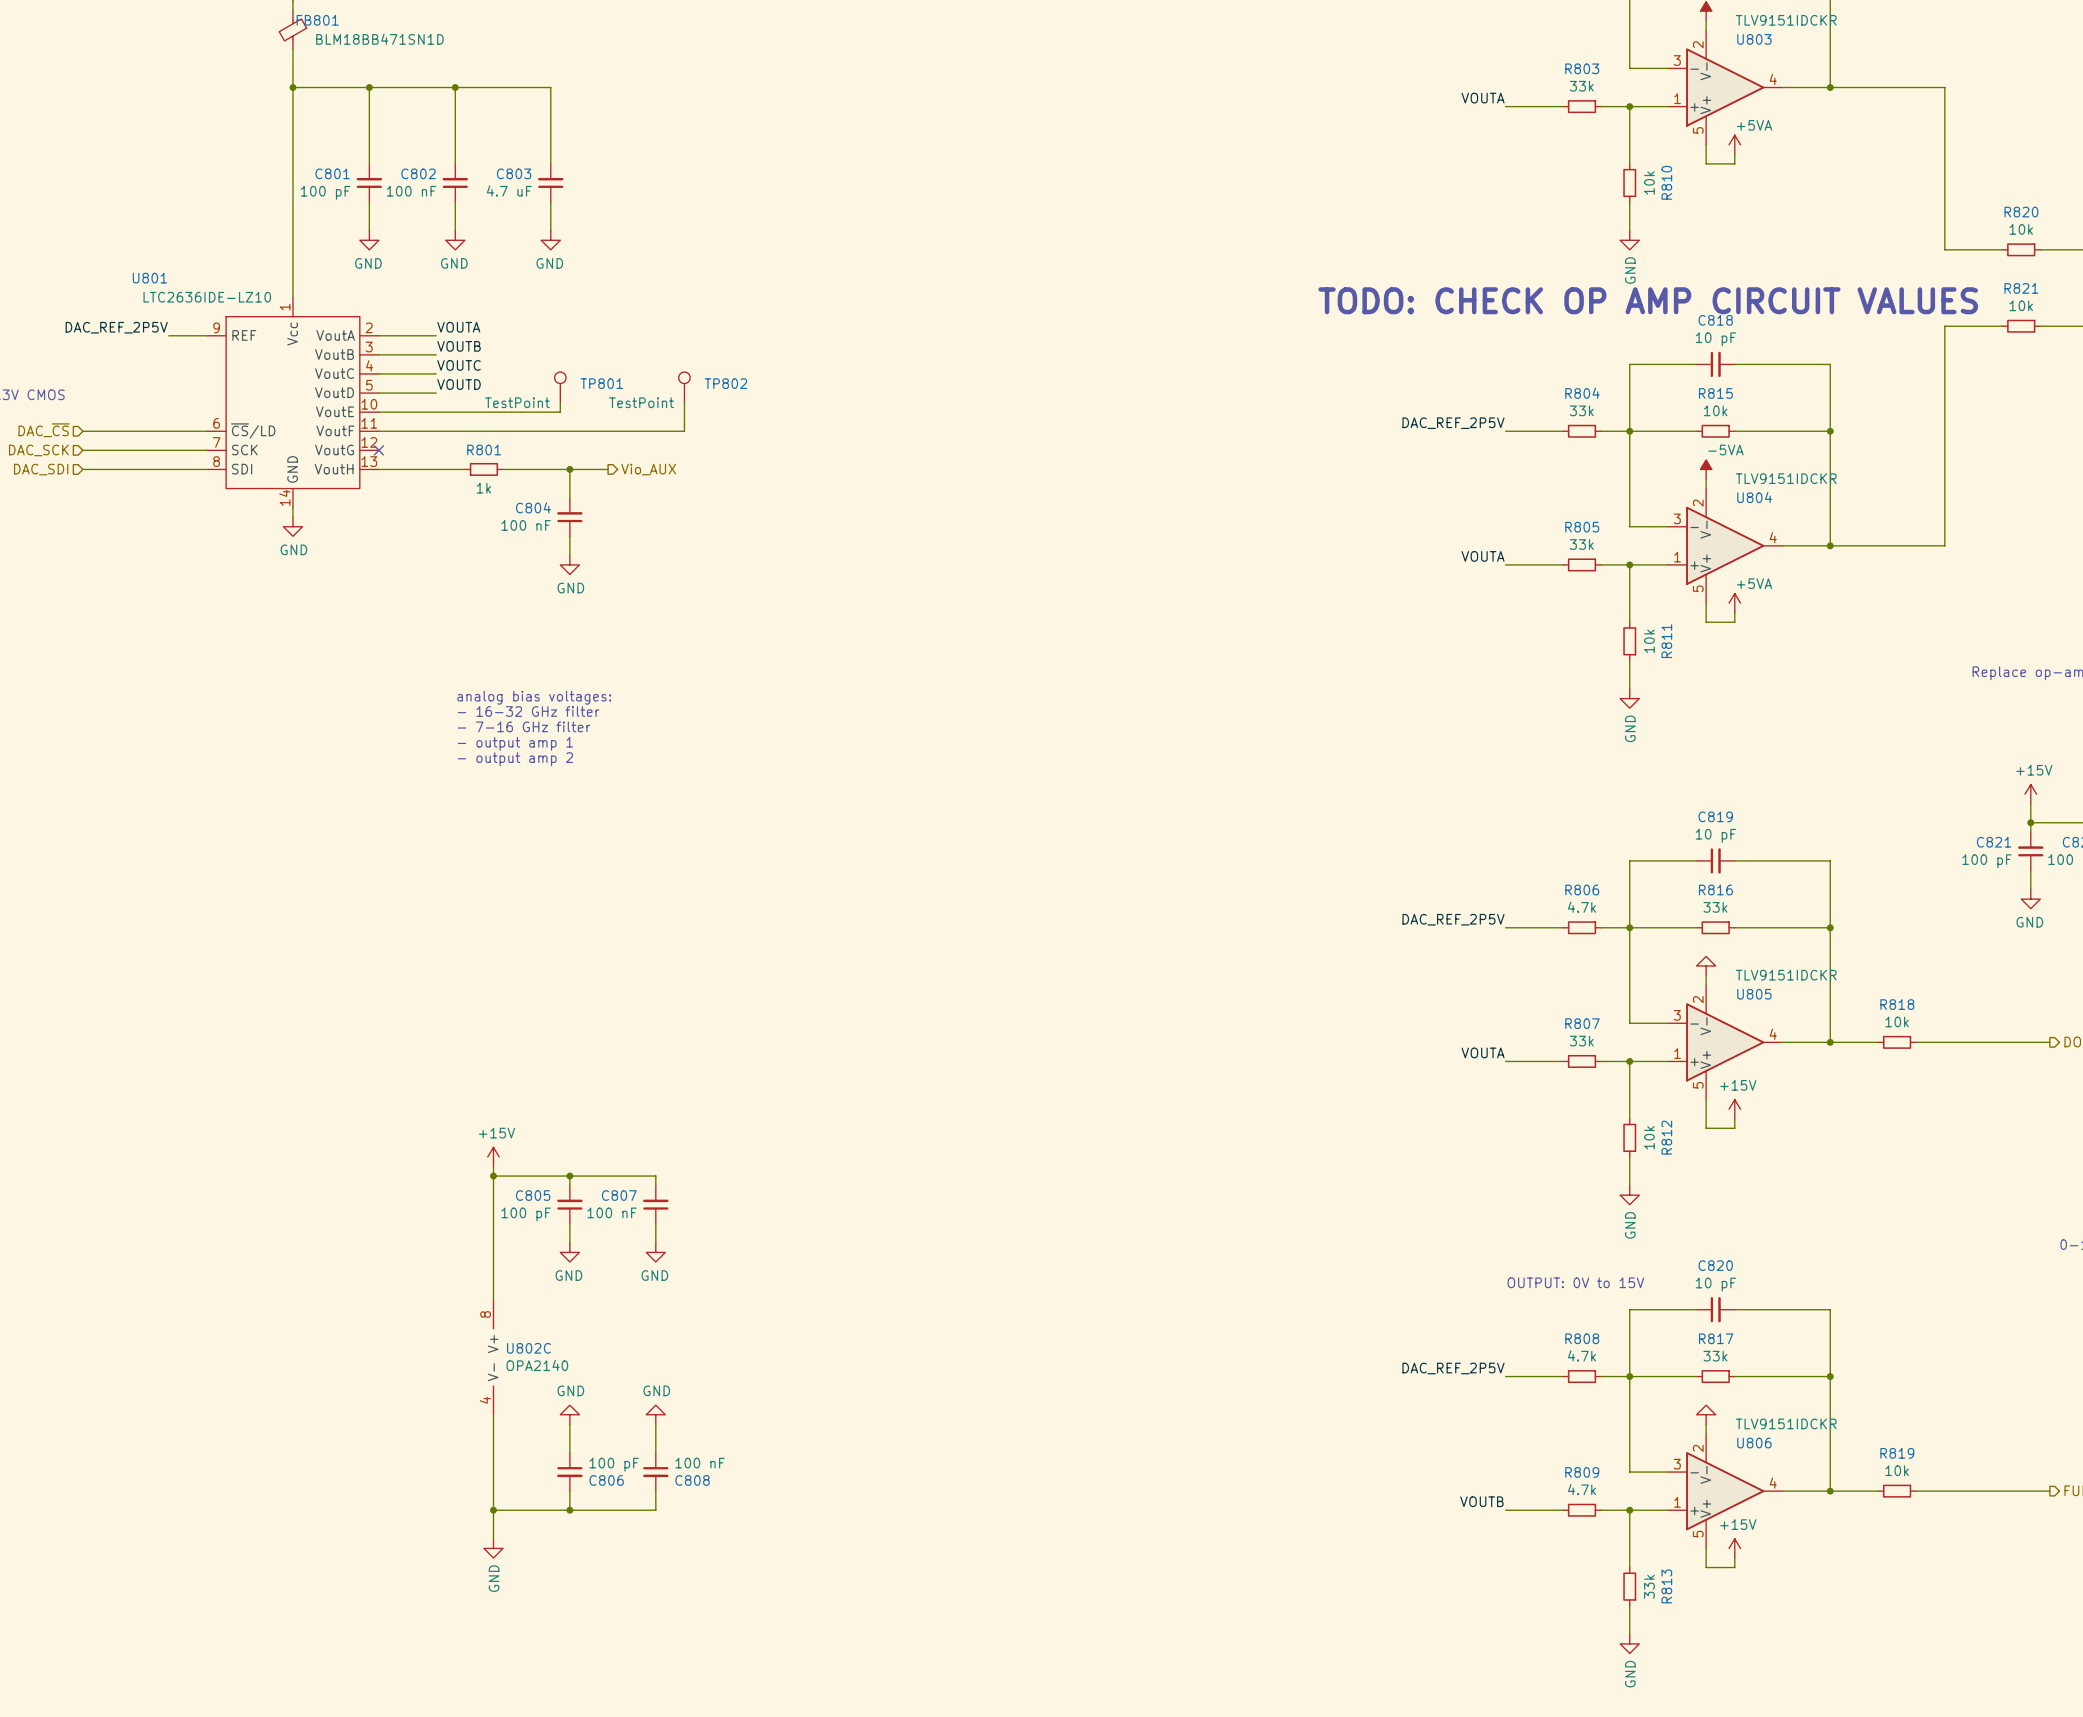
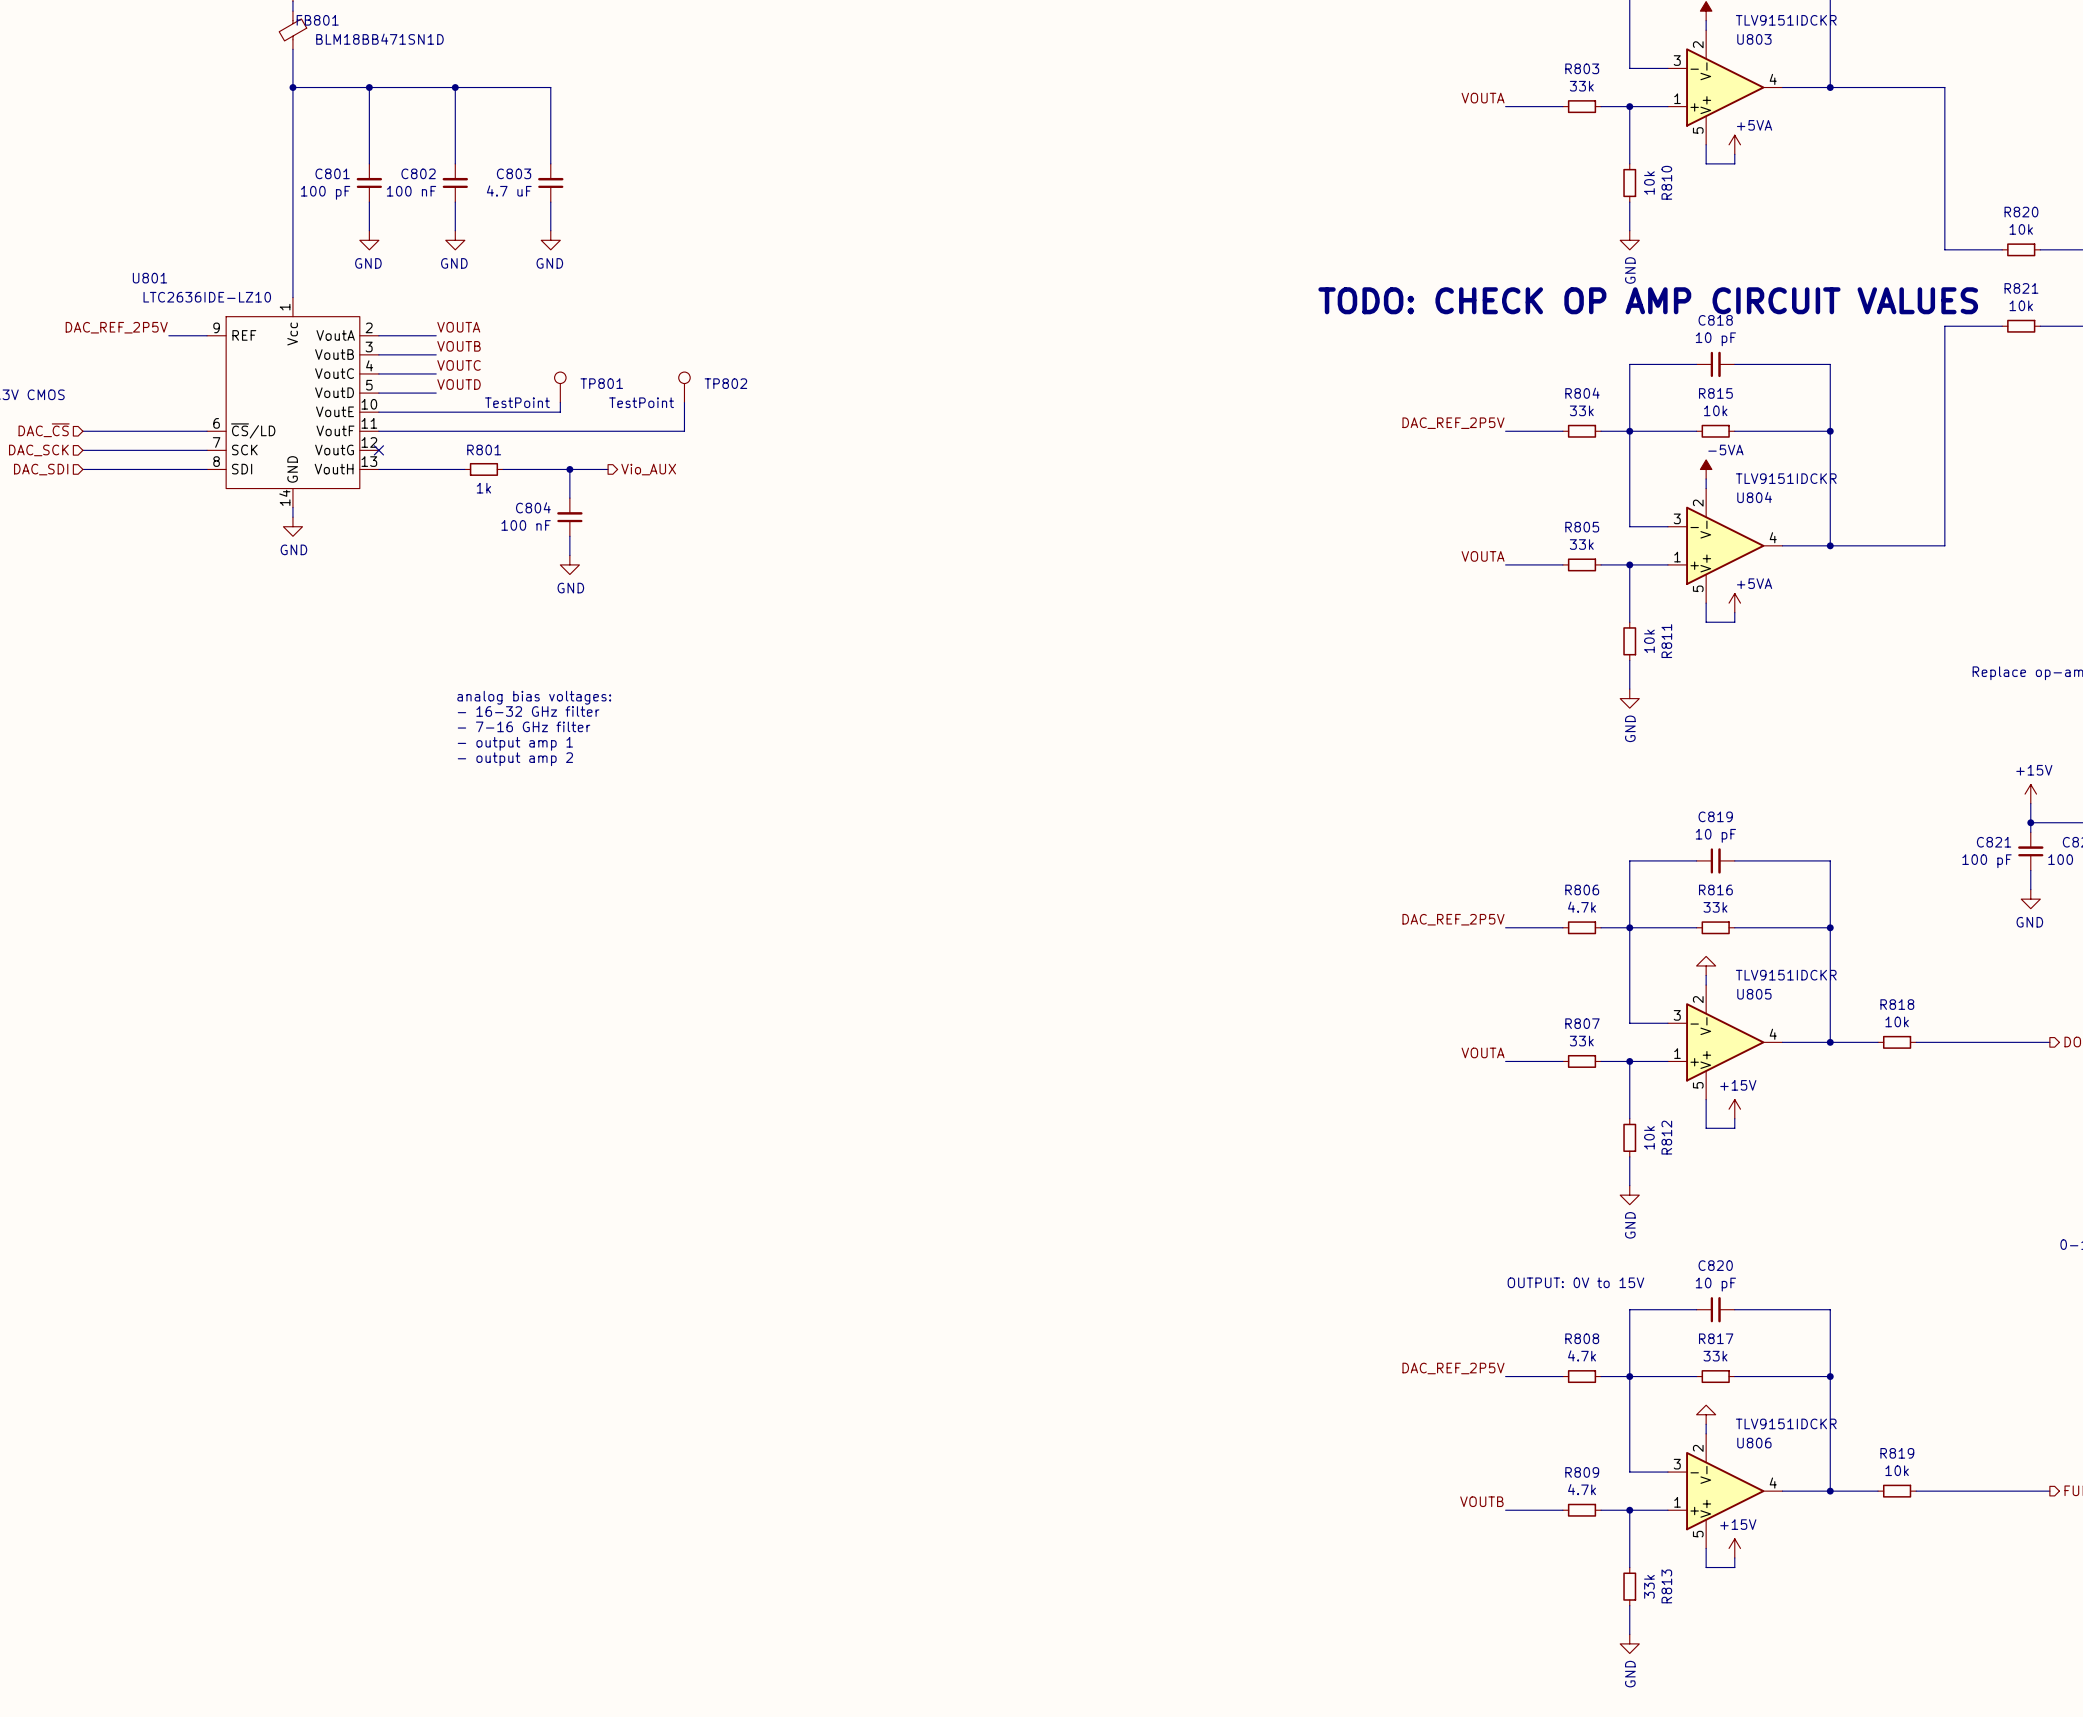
power symbol: +15V (493, 1156) -> none
wire: (493, 1166) (493, 1300) -> none
wire: (493, 1176) (655, 1176) (655, 1185) -> none
junction: (493, 1176) -> none
wire: (569, 1176) (569, 1185) -> none
junction: (569, 1176) -> none
C805: 100 pF (569, 1204) -> none
C807: 100 nF (655, 1204) -> none
wire: (569, 1223) (569, 1242) -> none
wire: (655, 1223) (655, 1242) -> none
power symbol: GND (569, 1252) -> none
power symbol: GND (655, 1252) -> none
U802C: OPA2140 (493, 1357) -> none
wire: (493, 1414) (493, 1538) -> none
power symbol: GND (569, 1414) -> none
power symbol: GND (655, 1414) -> none
wire: (569, 1424) (569, 1452) -> none
wire: (655, 1424) (655, 1452) -> none
C806: 100 pF (569, 1472) -> none
C808: 100 nF (655, 1472) -> none
wire: (569, 1491) (569, 1510) -> none
wire: (655, 1491) (655, 1510) (493, 1510) -> none
junction: (493, 1510) -> none
junction: (569, 1510) -> none
power symbol: GND (493, 1548) -> none

